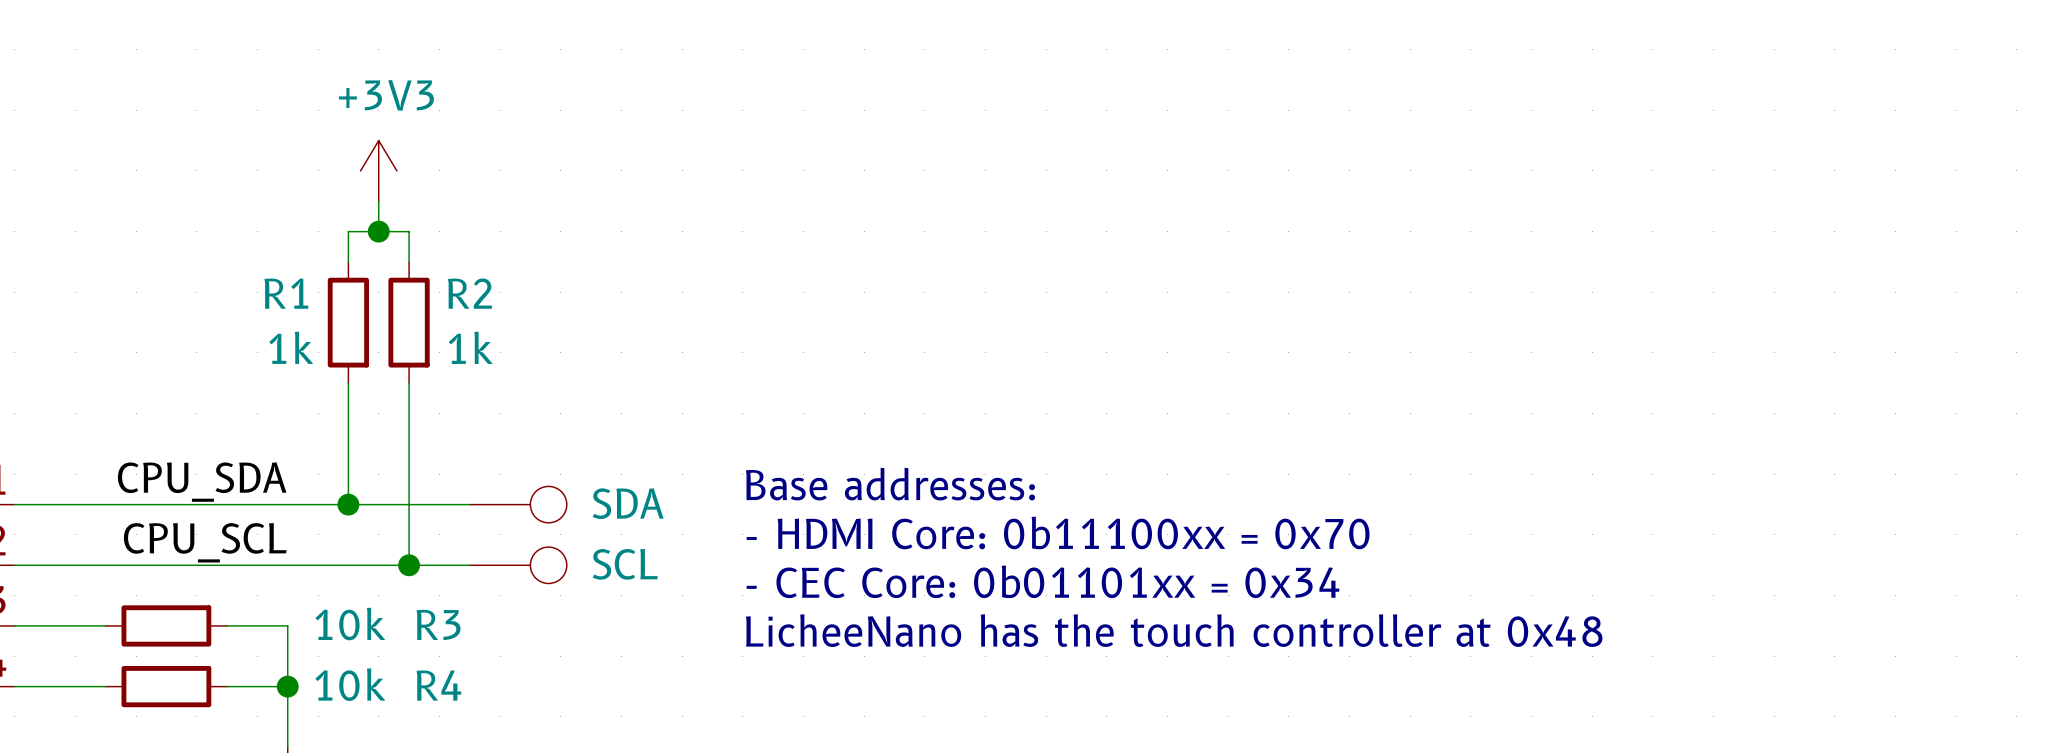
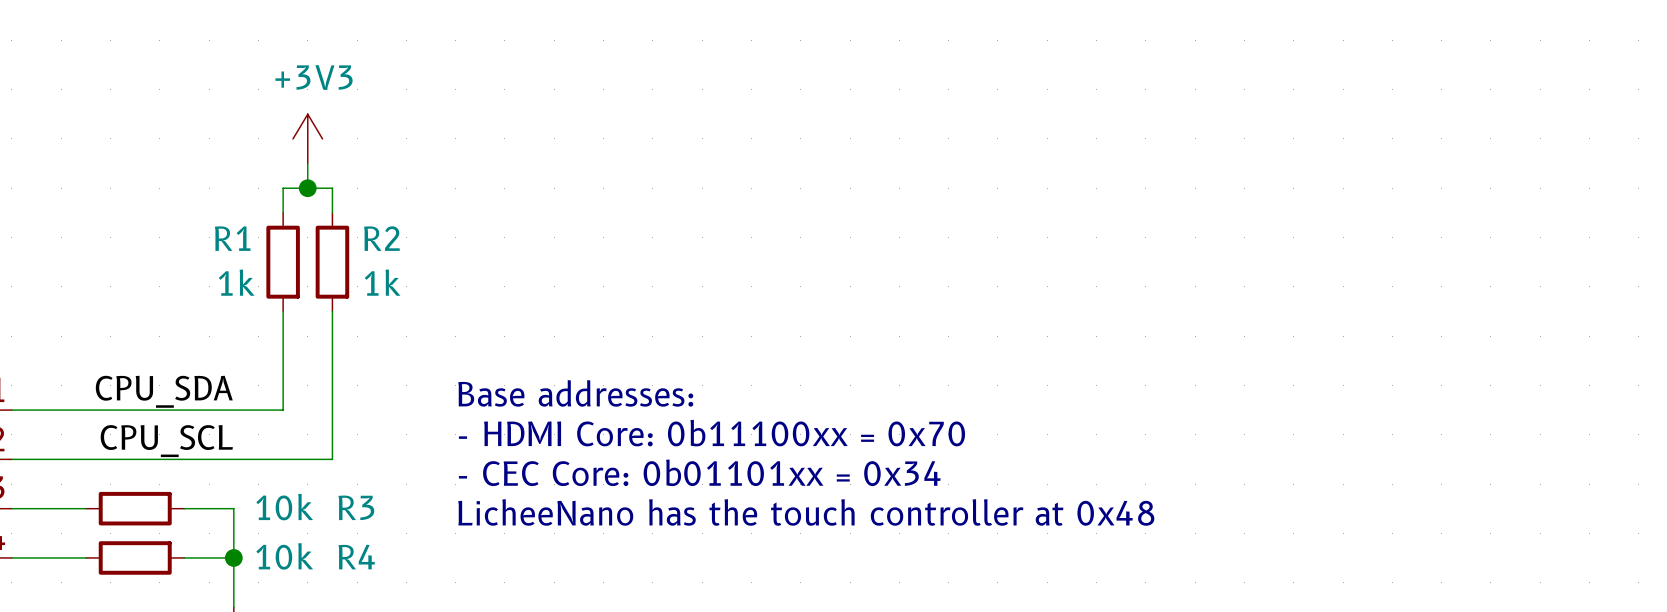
text position: Base addresses: (890, 484) -> Base addresses: (575, 393)
wire: (348, 504) (469, 504) -> none
junction: (348, 504) -> none
part: SDA (518, 504) -> none
text position: - HDMI Core: 0b11100xx = 0x70 (1058, 532) -> - HDMI Core: 0b11100xx = 0x70 (711, 433)
wire: (409, 565) (469, 565) -> none
junction: (409, 565) -> none
part: SCL (518, 565) -> none
text position: - CEC Core: 0b01101xx = 0x34 (1043, 581) -> - CEC Core: 0b01101xx = 0x34 (699, 472)
text position: LicheeNano has the touch controller at 0x48 (1174, 630) -> LicheeNano has the touch controller at 0x48 (806, 512)

